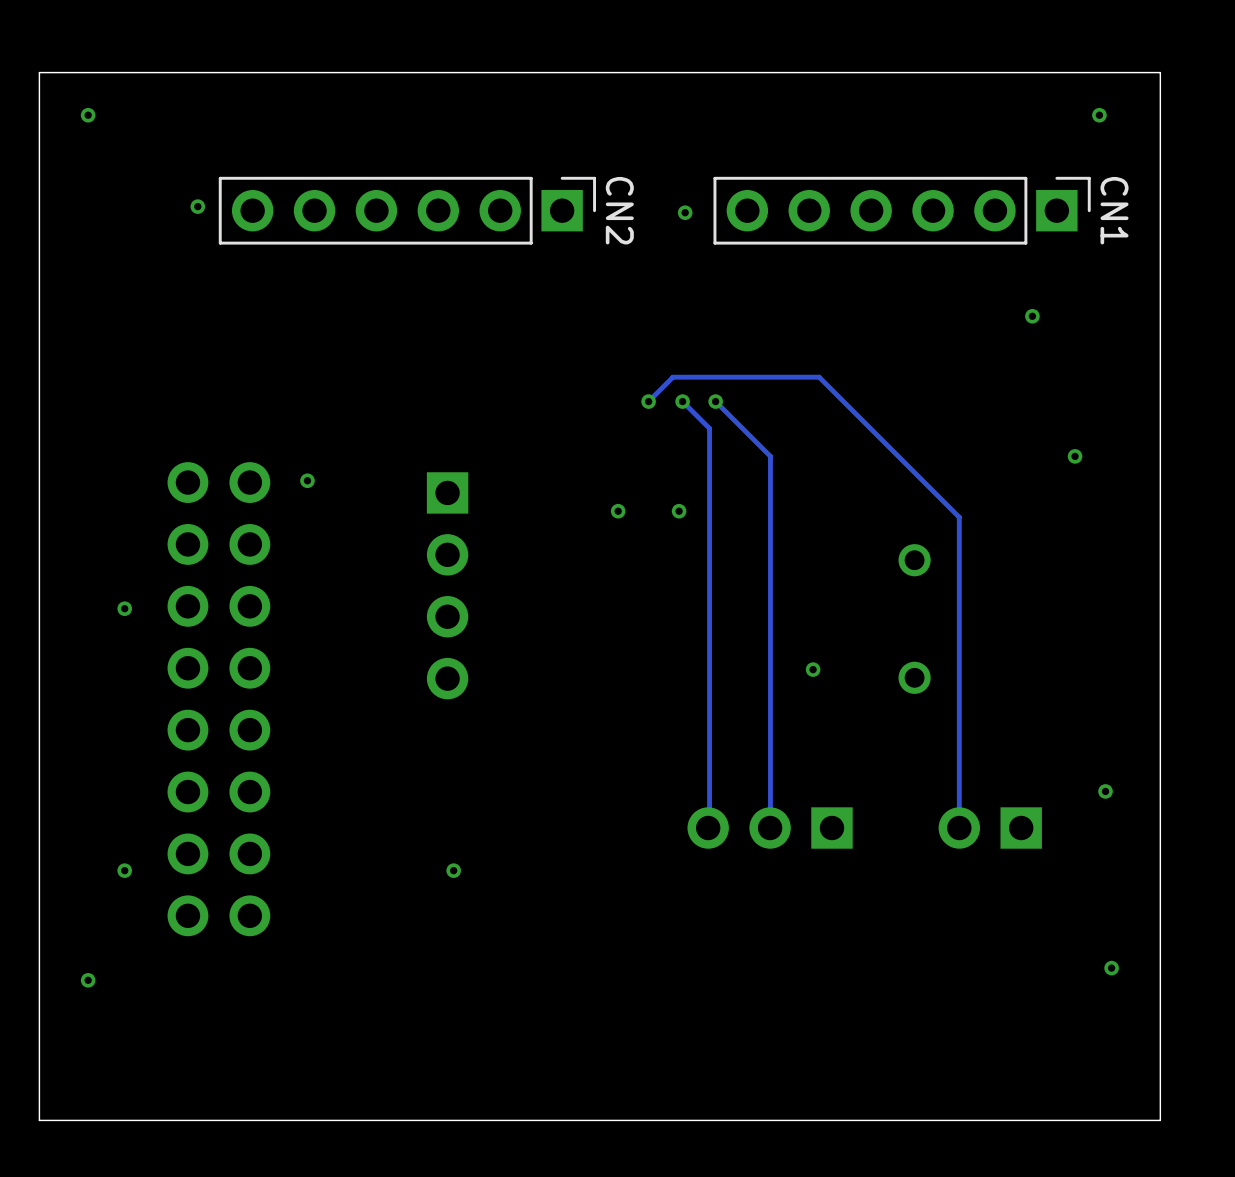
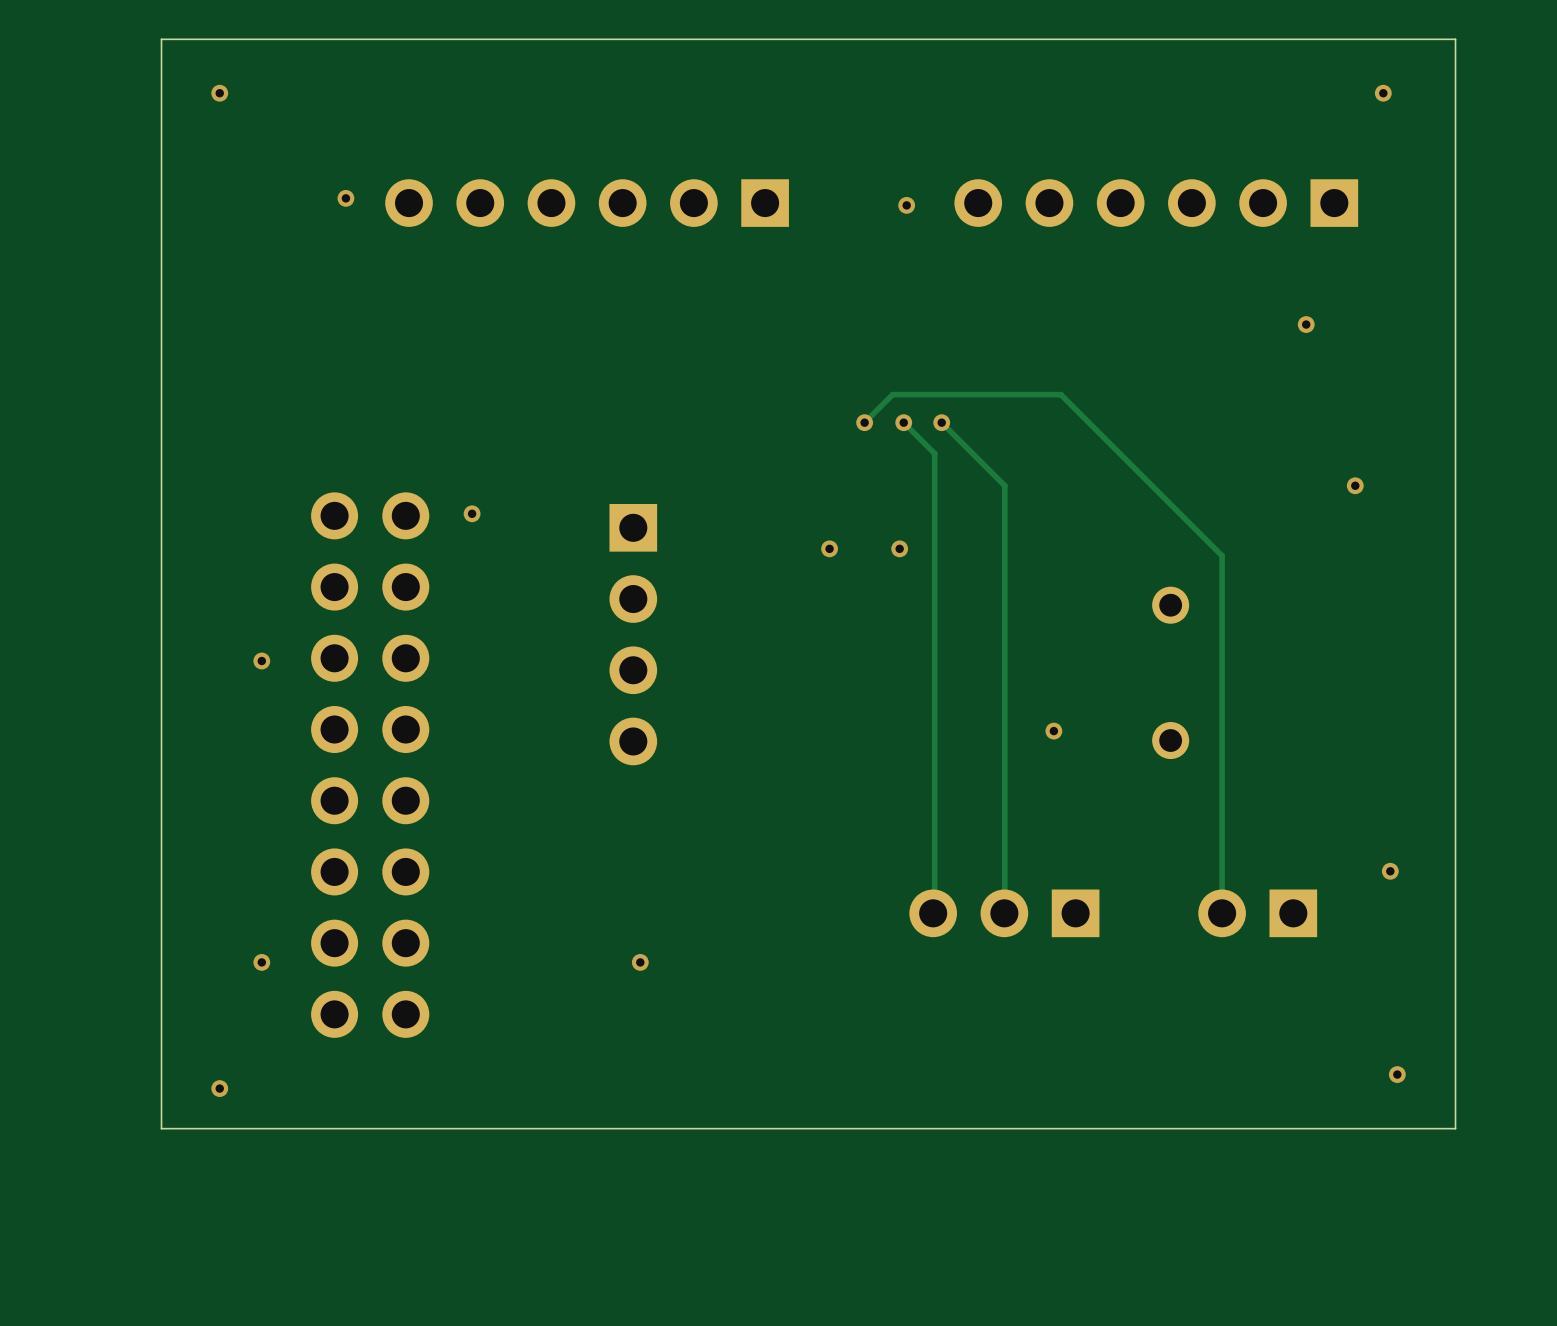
board edge: (1160, 72) (39, 72) (39, 1120) (1160, 1120) (1160, 72) -> (1455, 39) (1455, 1128) (161, 1128) (161, 39) (1455, 39)
CN2 side: bottom (407, 210) -> top (587, 203)
CN1 side: bottom (902, 210) -> top (1156, 203)

